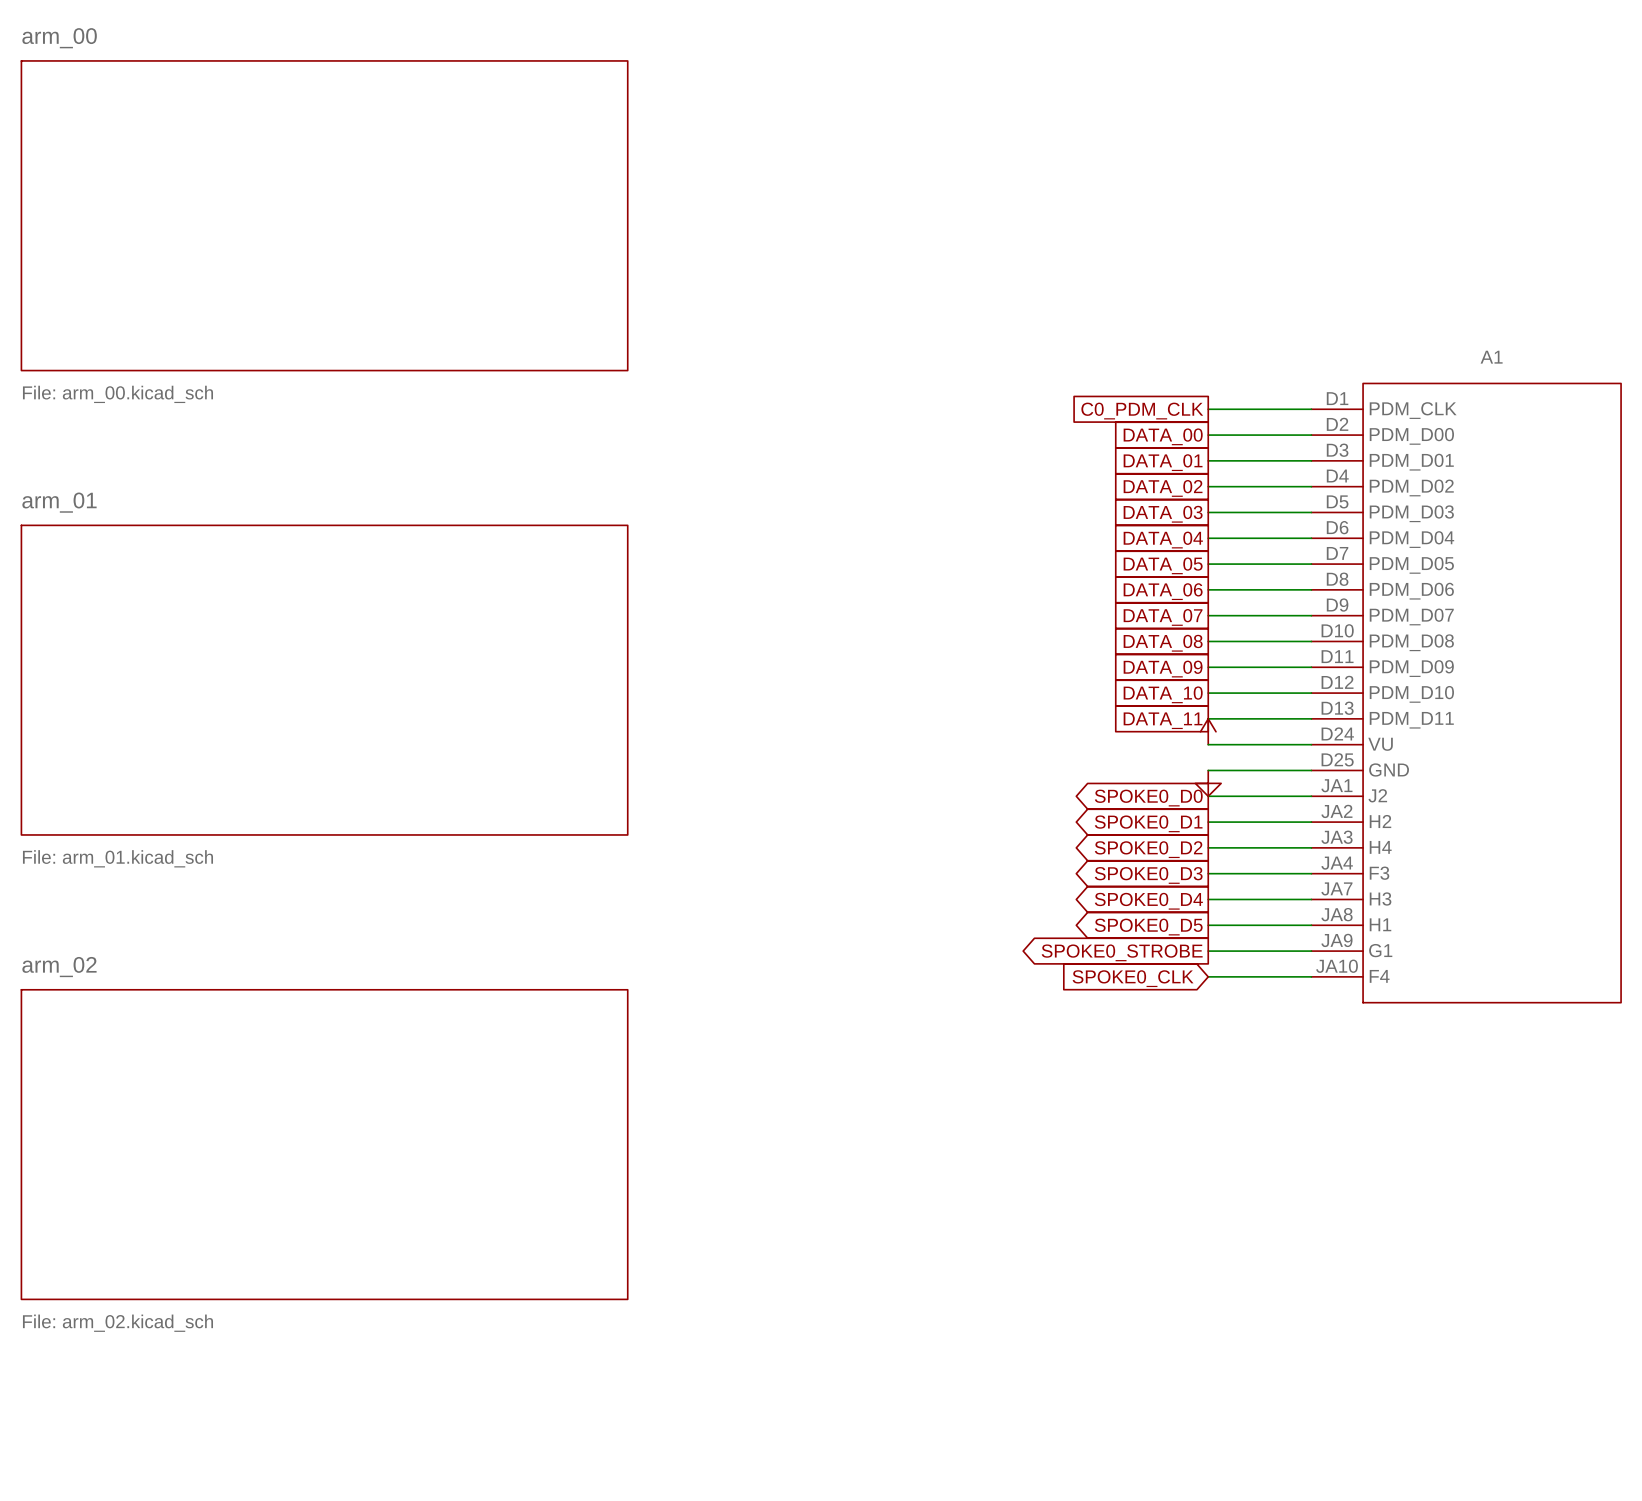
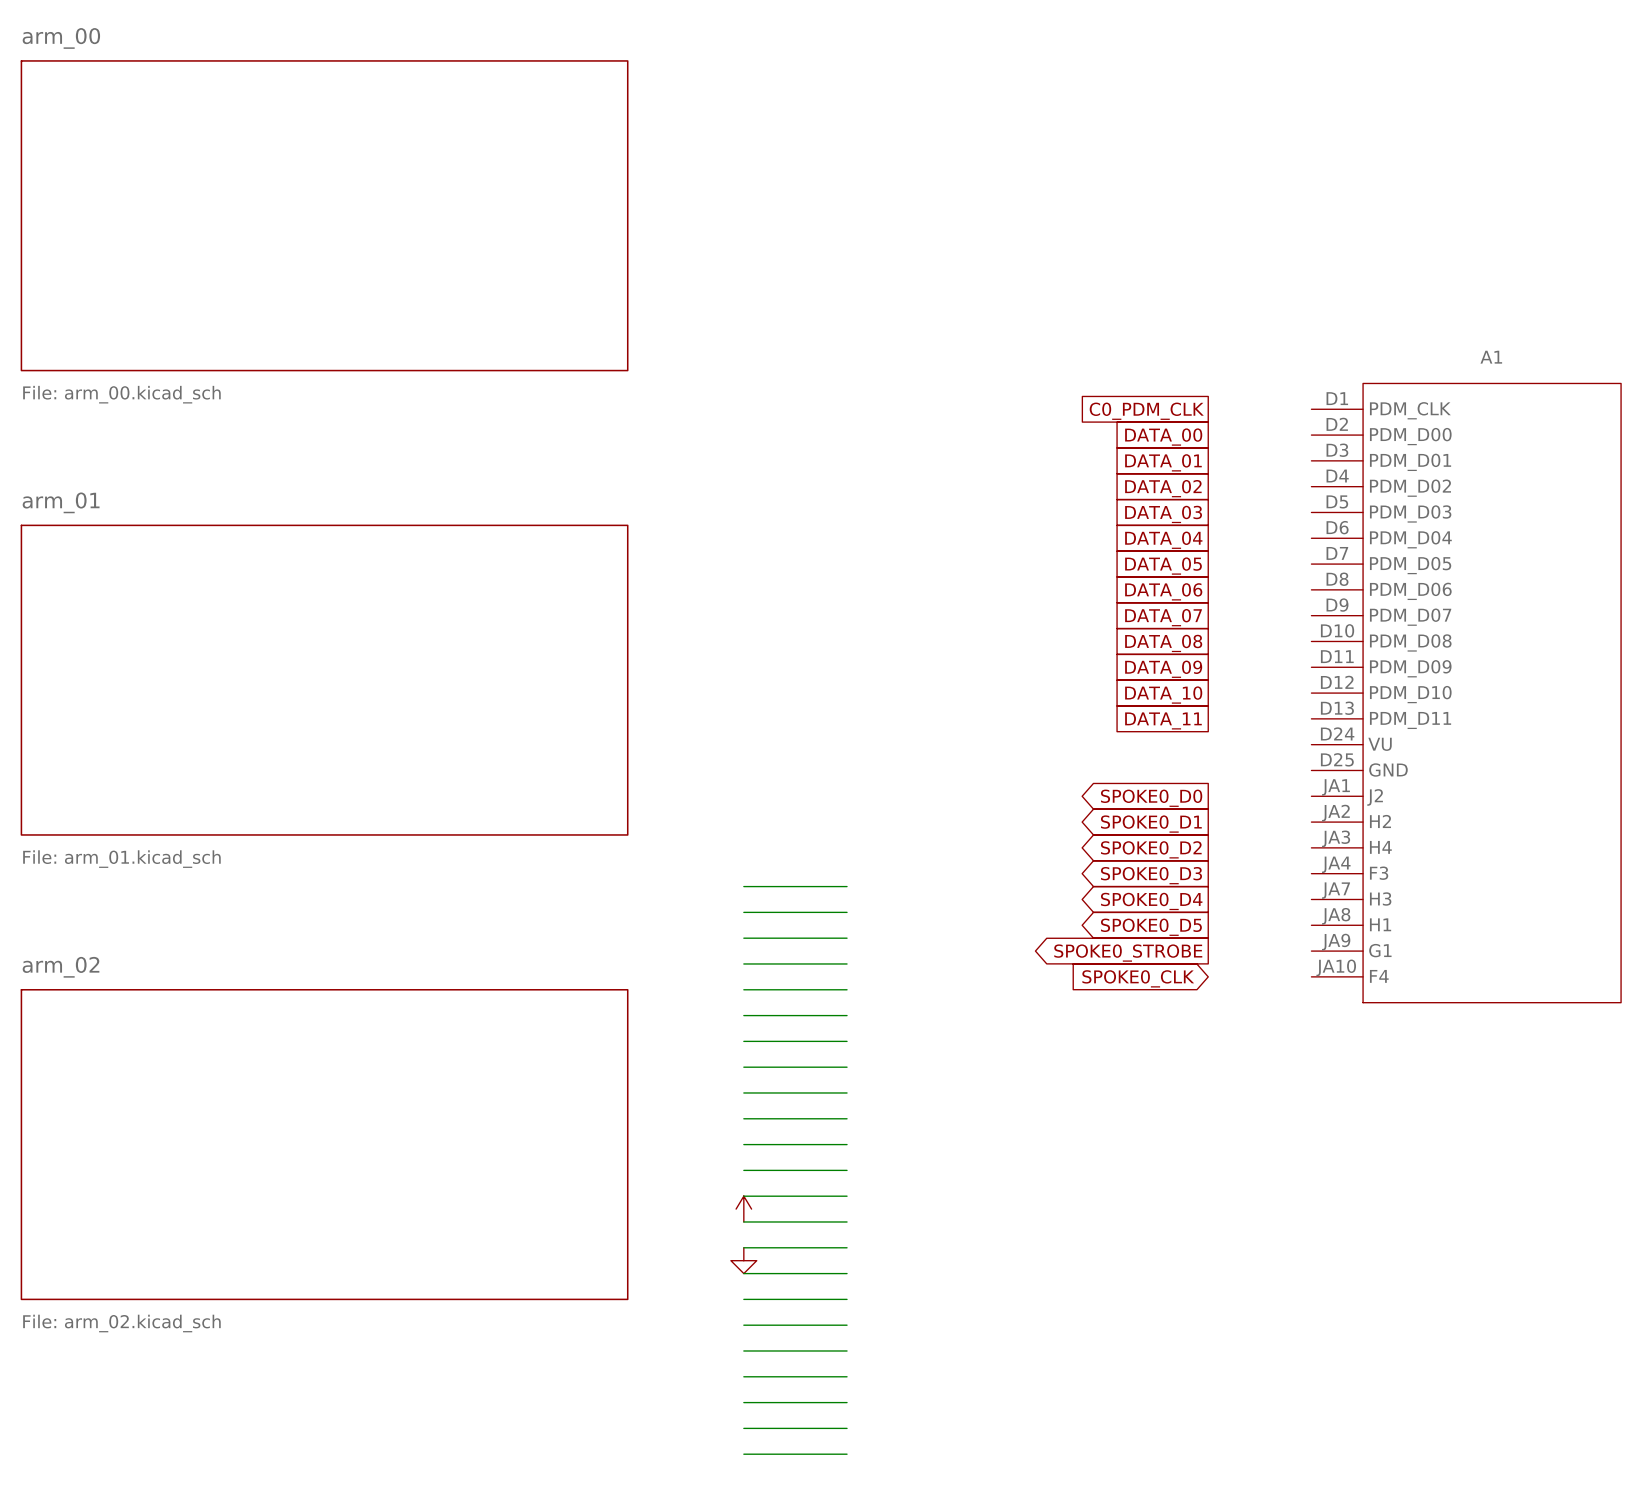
wire: (1208, 409) (1311, 409) -> none
wire: (1208, 435) (1311, 435) -> none
wire: (1208, 460) (1311, 460) -> none
wire: (1208, 486) (1311, 486) -> none
wire: (1208, 512) (1311, 512) -> none
wire: (1208, 538) (1311, 538) -> none
wire: (1208, 564) (1311, 564) -> none
wire: (1208, 589) (1311, 589) -> none
wire: (1208, 615) (1311, 615) -> none
wire: (1208, 641) (1311, 641) -> none
wire: (1208, 667) (1311, 667) -> none
wire: (1208, 693) (1311, 693) -> none
wire: (1208, 718) (1311, 718) -> none
power symbol: (1208, 731) -> none
wire: (1208, 744) (1311, 744) -> none
wire: (1208, 770) (1311, 770) -> none
power symbol: (1208, 783) -> none
wire: (1208, 796) (1311, 796) -> none
wire: (1208, 822) (1311, 822) -> none
wire: (1208, 847) (1311, 847) -> none
wire: (1208, 873) (1311, 873) -> none
wire: none -> (743, 886) (847, 886)
wire: (1208, 899) (1311, 899) -> none
wire: none -> (743, 912) (847, 912)
wire: (1208, 925) (1311, 925) -> none
wire: none -> (743, 938) (847, 938)
wire: (1208, 951) (1311, 951) -> none
wire: none -> (743, 963) (847, 963)
wire: (1208, 976) (1311, 976) -> none
wire: none -> (743, 989) (847, 989)
wire: none -> (743, 1015) (847, 1015)
wire: none -> (743, 1041) (847, 1041)
wire: none -> (743, 1067) (847, 1067)
wire: none -> (743, 1092) (847, 1092)
wire: none -> (743, 1118) (847, 1118)
wire: none -> (743, 1144) (847, 1144)
wire: none -> (743, 1170) (847, 1170)
wire: none -> (743, 1196) (847, 1196)
power symbol: none -> (743, 1209)
wire: none -> (743, 1221) (847, 1221)
wire: none -> (743, 1247) (847, 1247)
power symbol: none -> (743, 1260)
wire: none -> (743, 1273) (847, 1273)
wire: none -> (743, 1299) (847, 1299)
wire: none -> (743, 1325) (847, 1325)
wire: none -> (743, 1350) (847, 1350)
wire: none -> (743, 1376) (847, 1376)
wire: none -> (743, 1402) (847, 1402)
wire: none -> (743, 1428) (847, 1428)
wire: none -> (743, 1454) (847, 1454)

